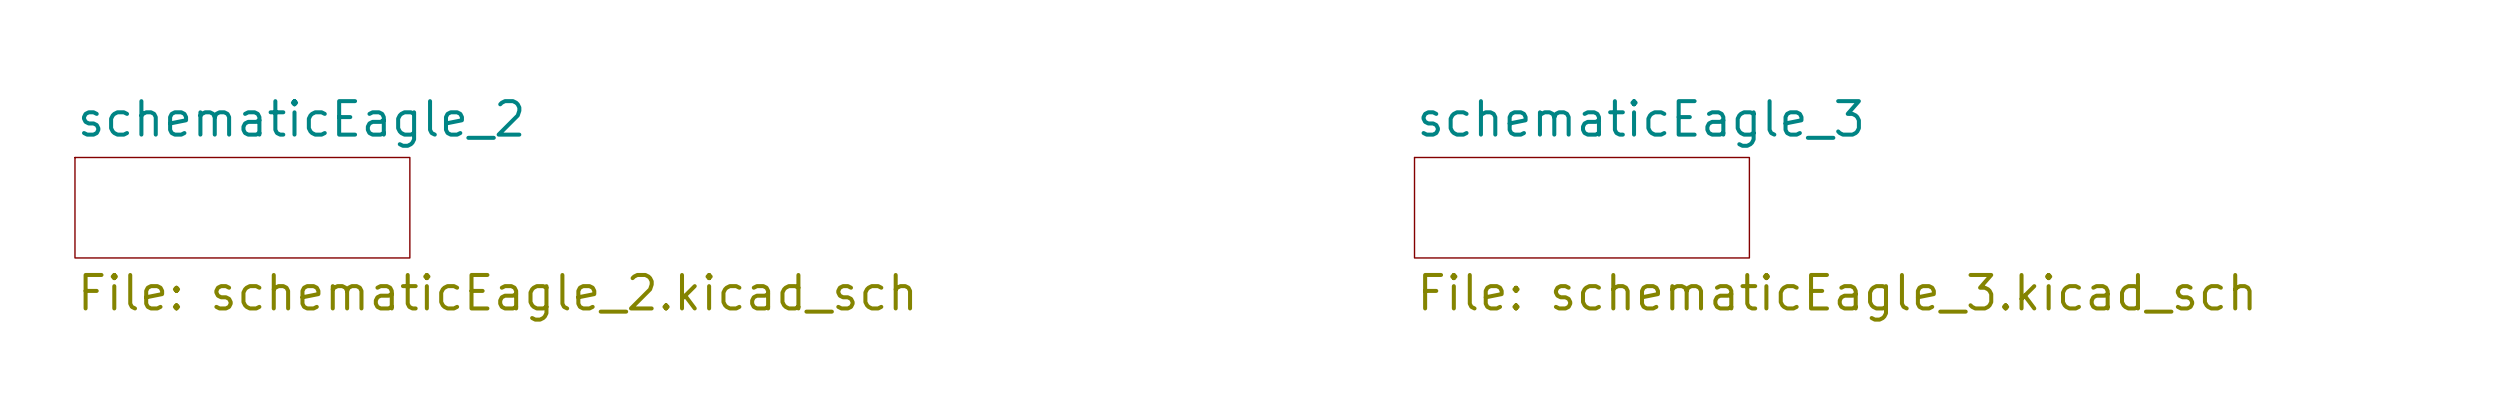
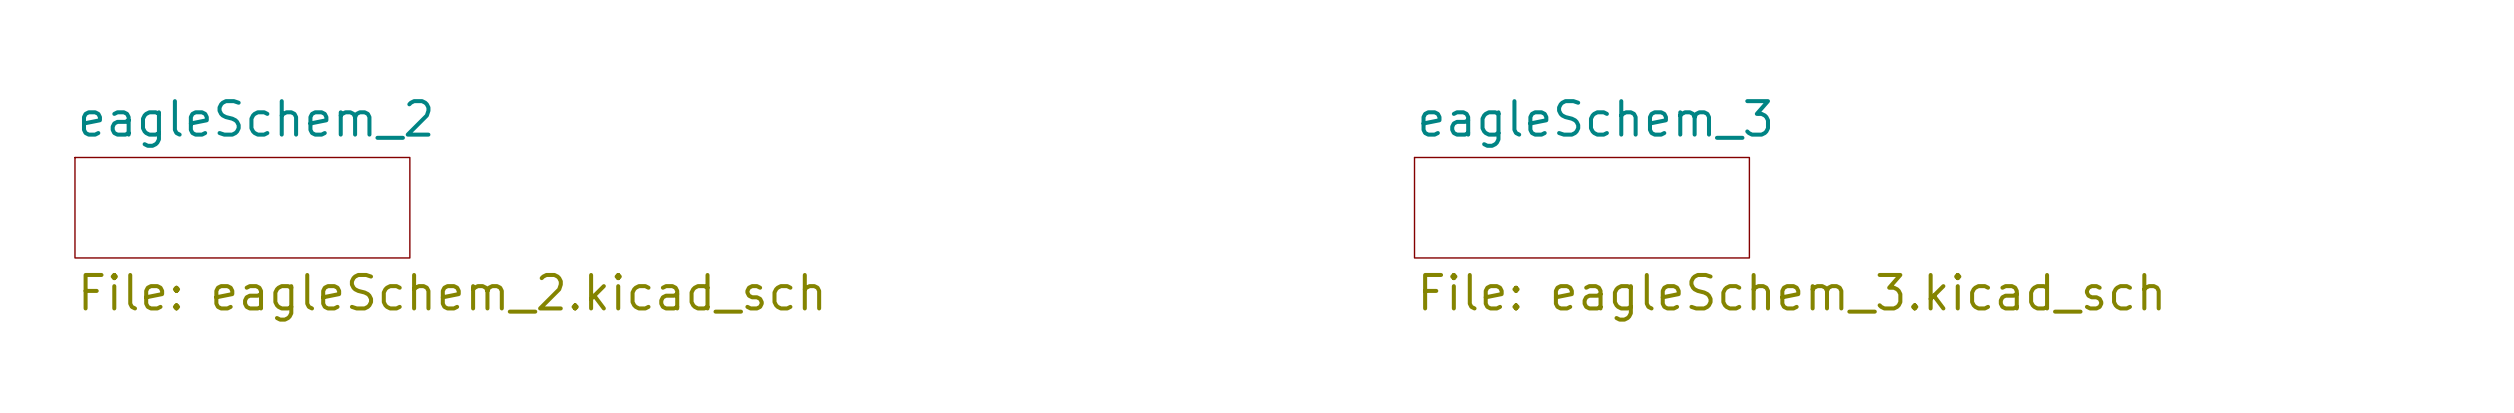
sheet schematicEagle_2 name: schematicEagle_2 (301, 123) -> eagleSchem_2 (256, 123)
sheet schematicEagle_3 name: schematicEagle_3 (1641, 123) -> eagleSchem_3 (1595, 123)
sheet schematicEagle_2 value: File: schematicEagle_2.kicad_sch (497, 297) -> File: eagleSchem_2.kicad_sch (452, 297)
sheet schematicEagle_3 value: File: schematicEagle_3.kicad_sch (1837, 297) -> File: eagleSchem_3.kicad_sch (1791, 297)

